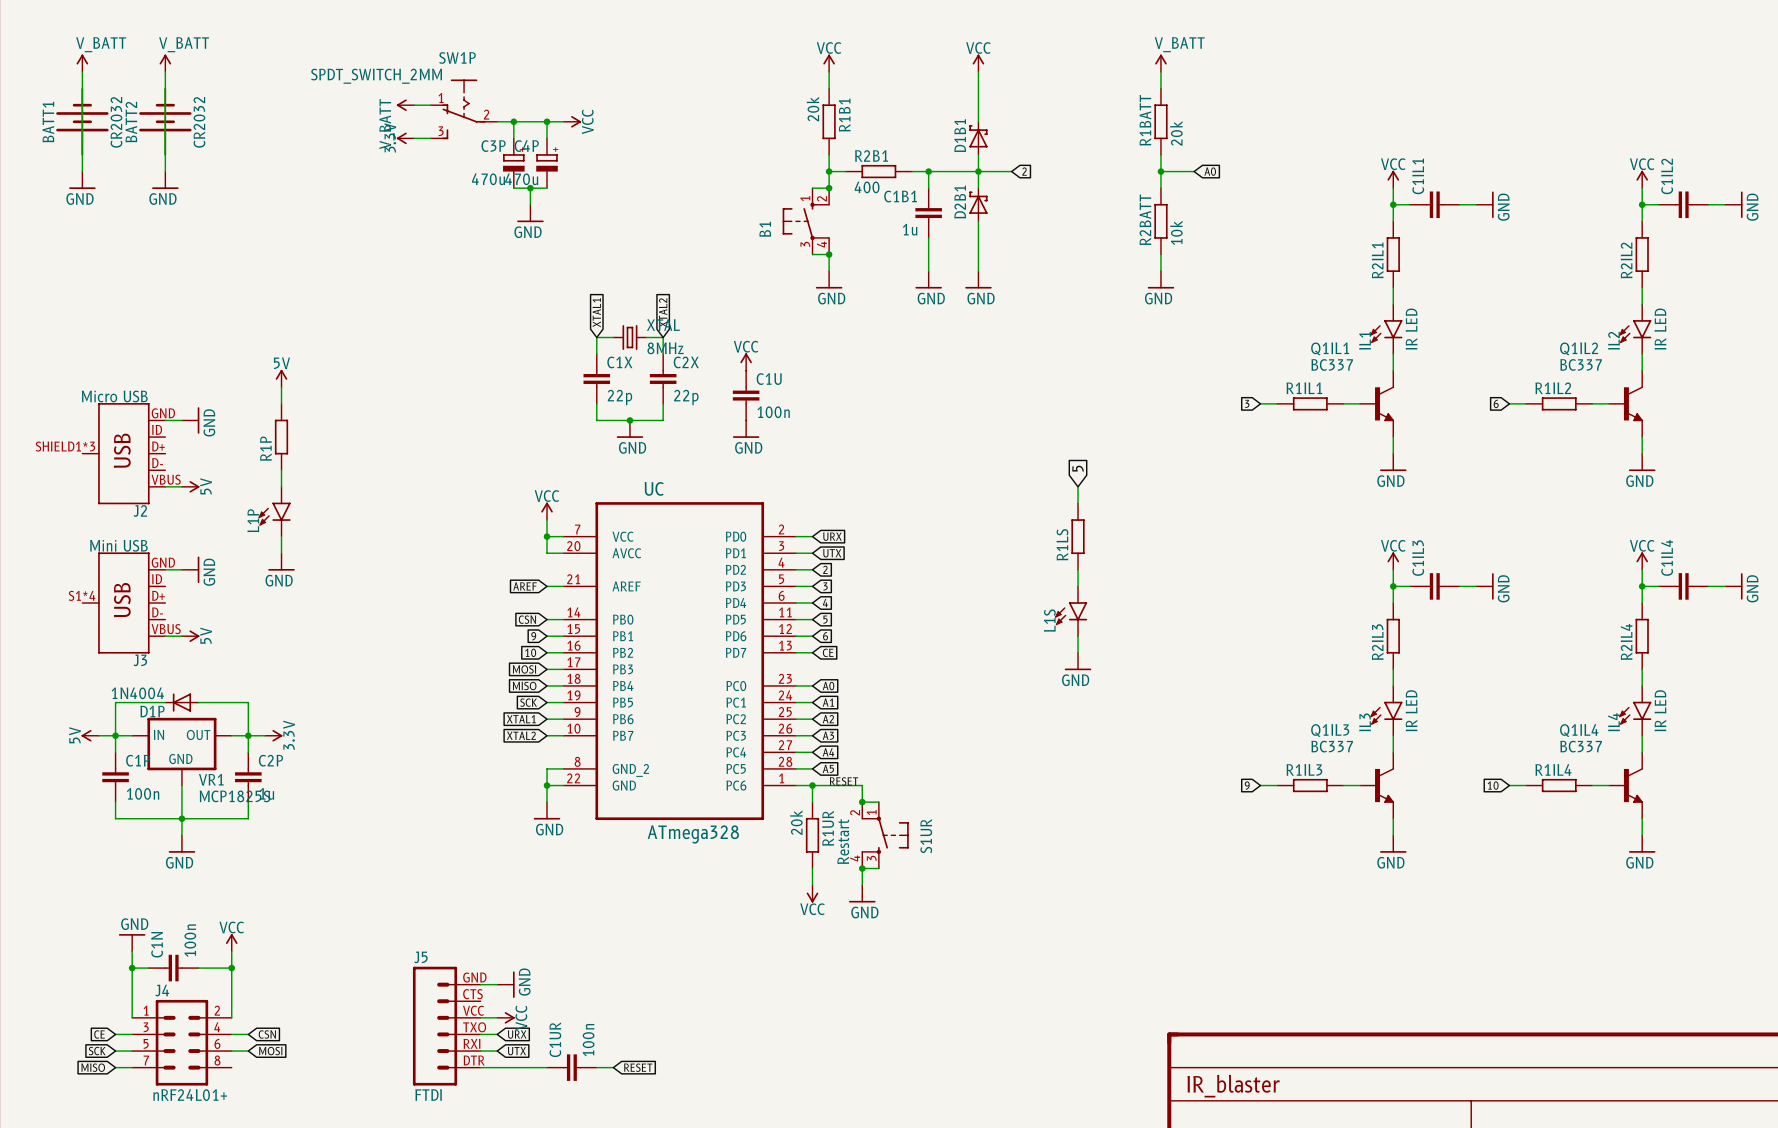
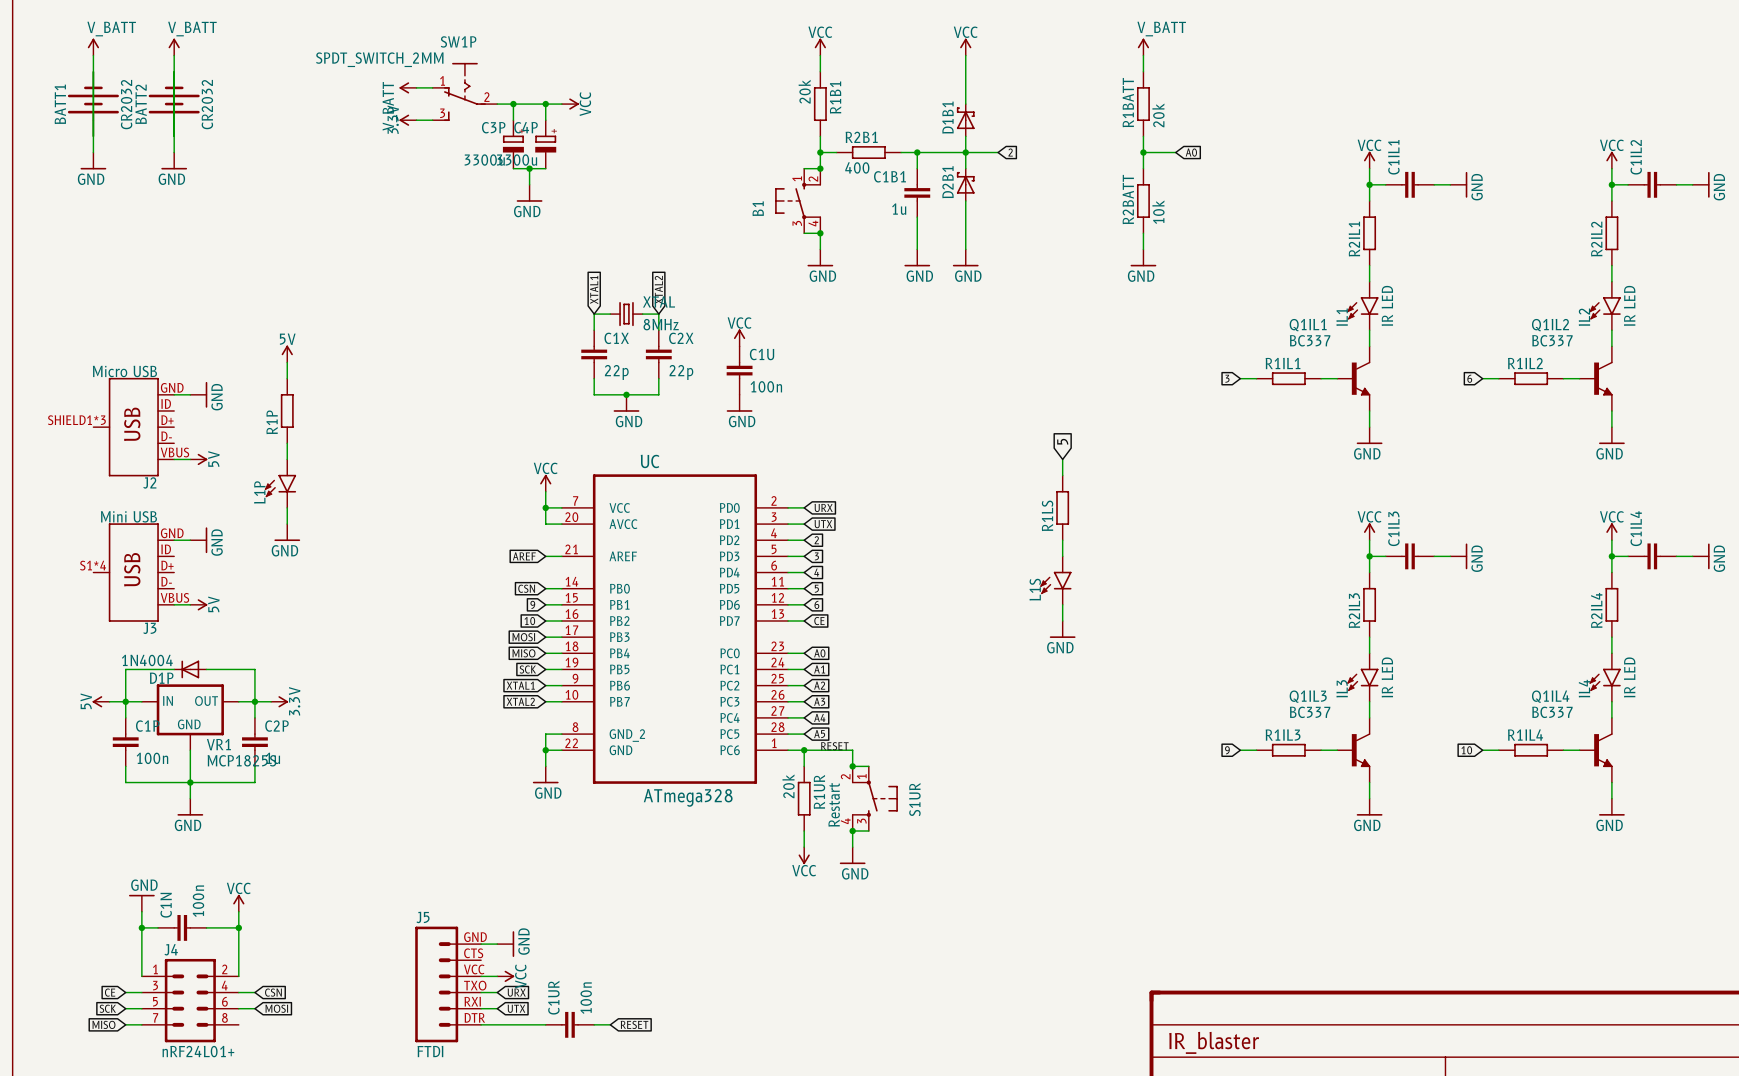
C3P value: 470u (488, 179) -> 3300u (484, 160)
C4P value: 470u (521, 179) -> 3300u (517, 160)

